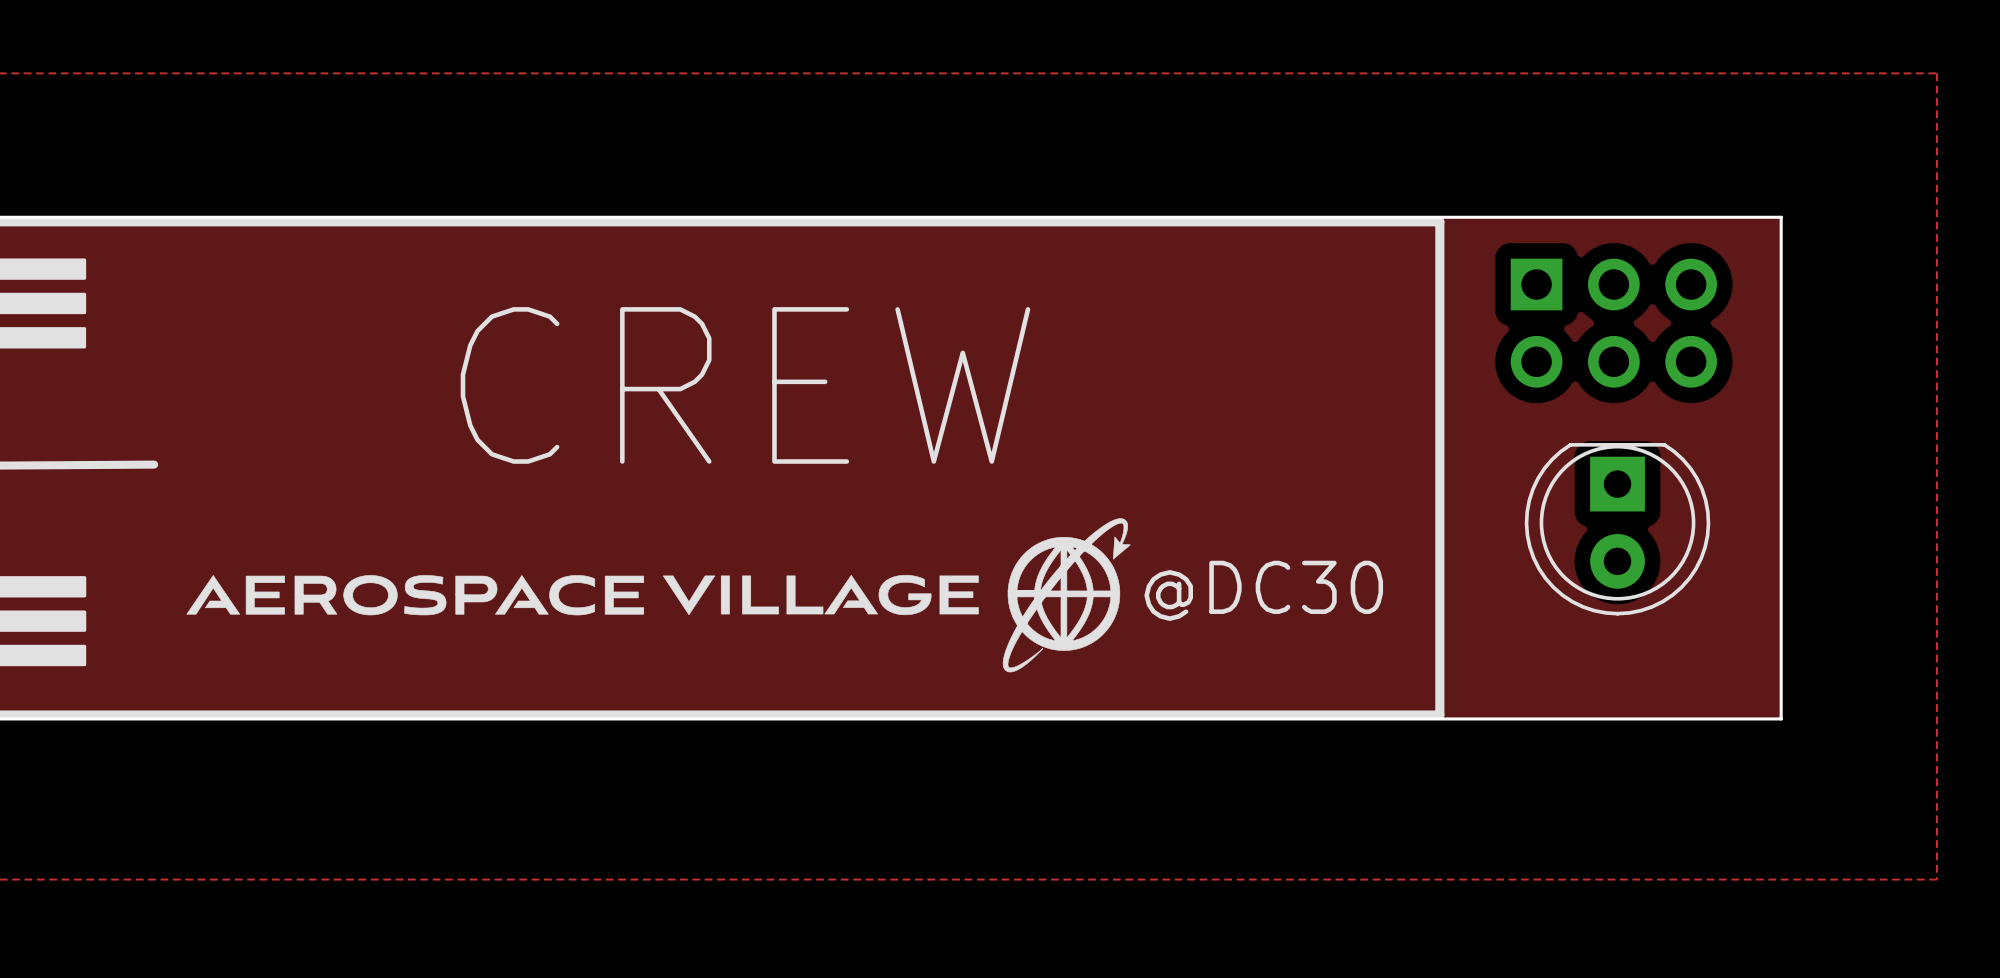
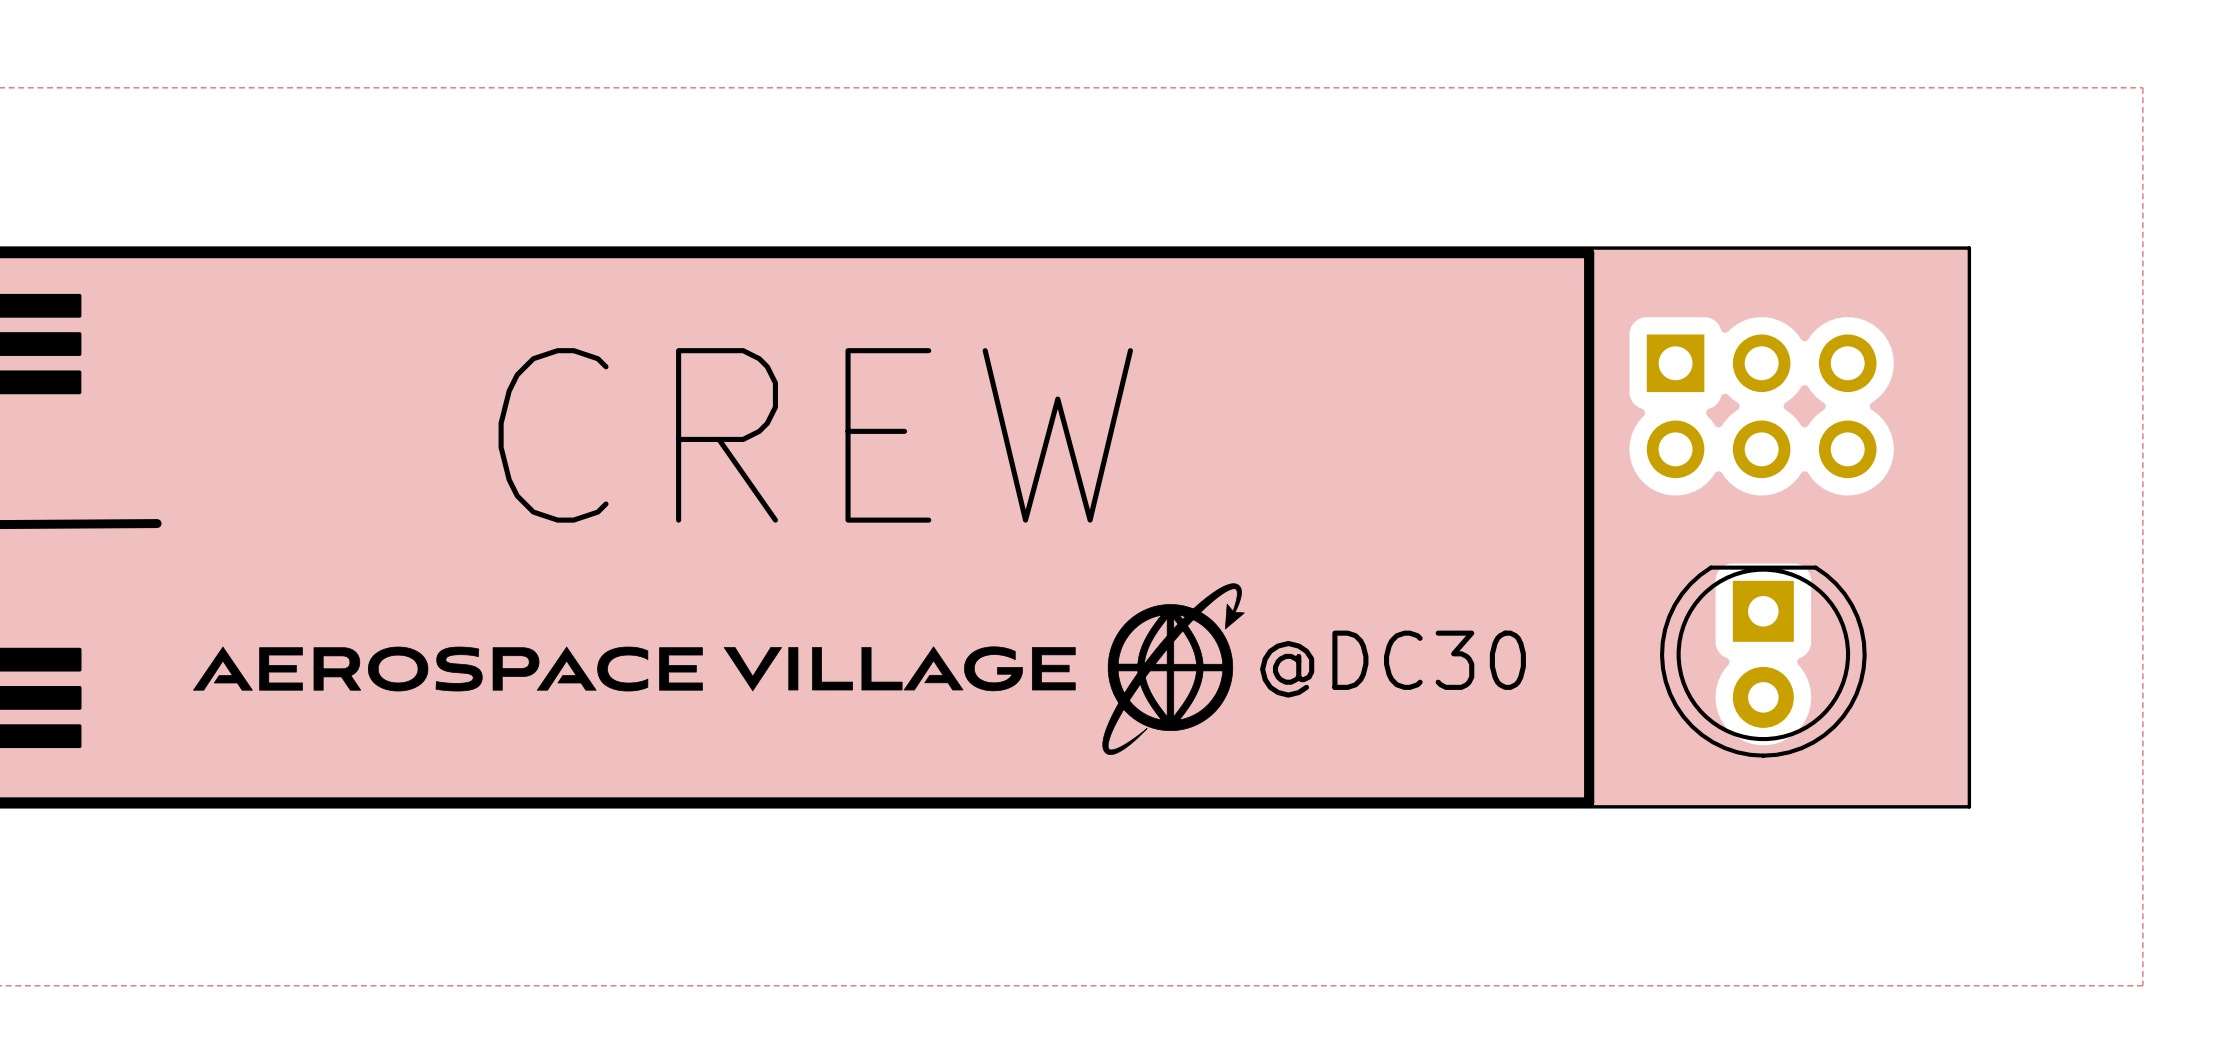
part position: (1613, 323) -> (1761, 406)
part position: (1617, 529) -> (1763, 661)

